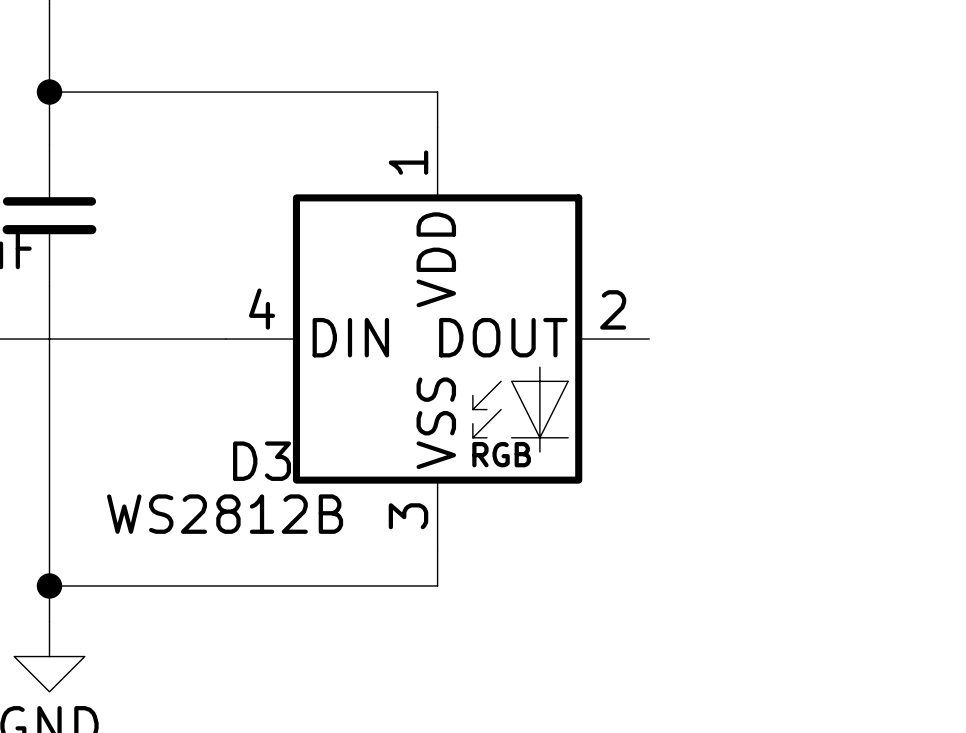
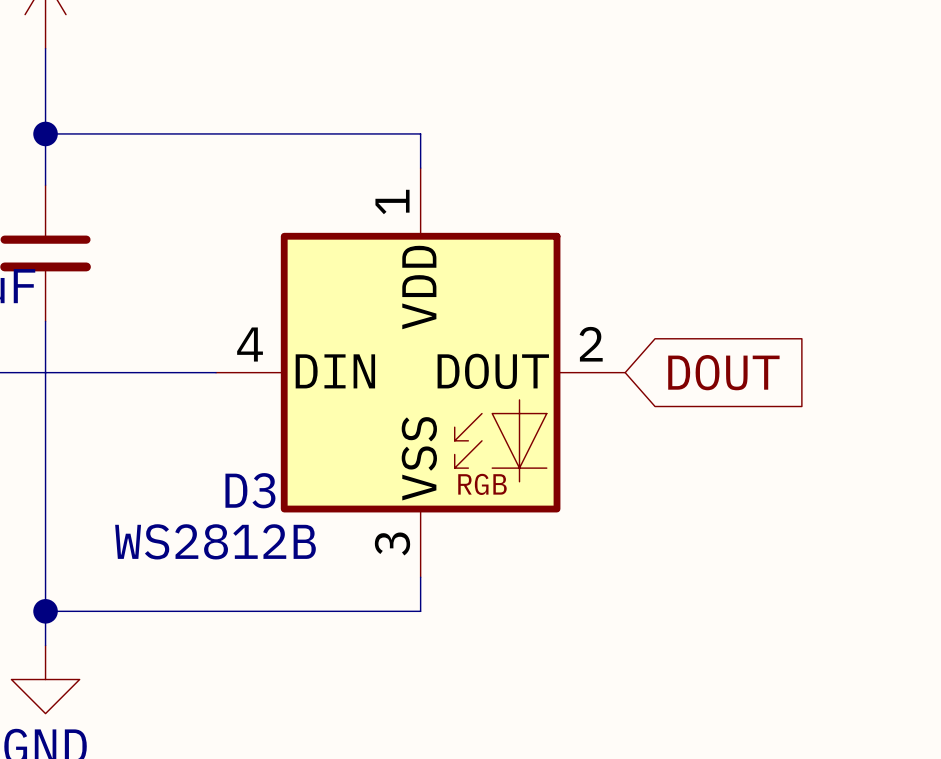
global label: none -> DOUT (723, 372)

